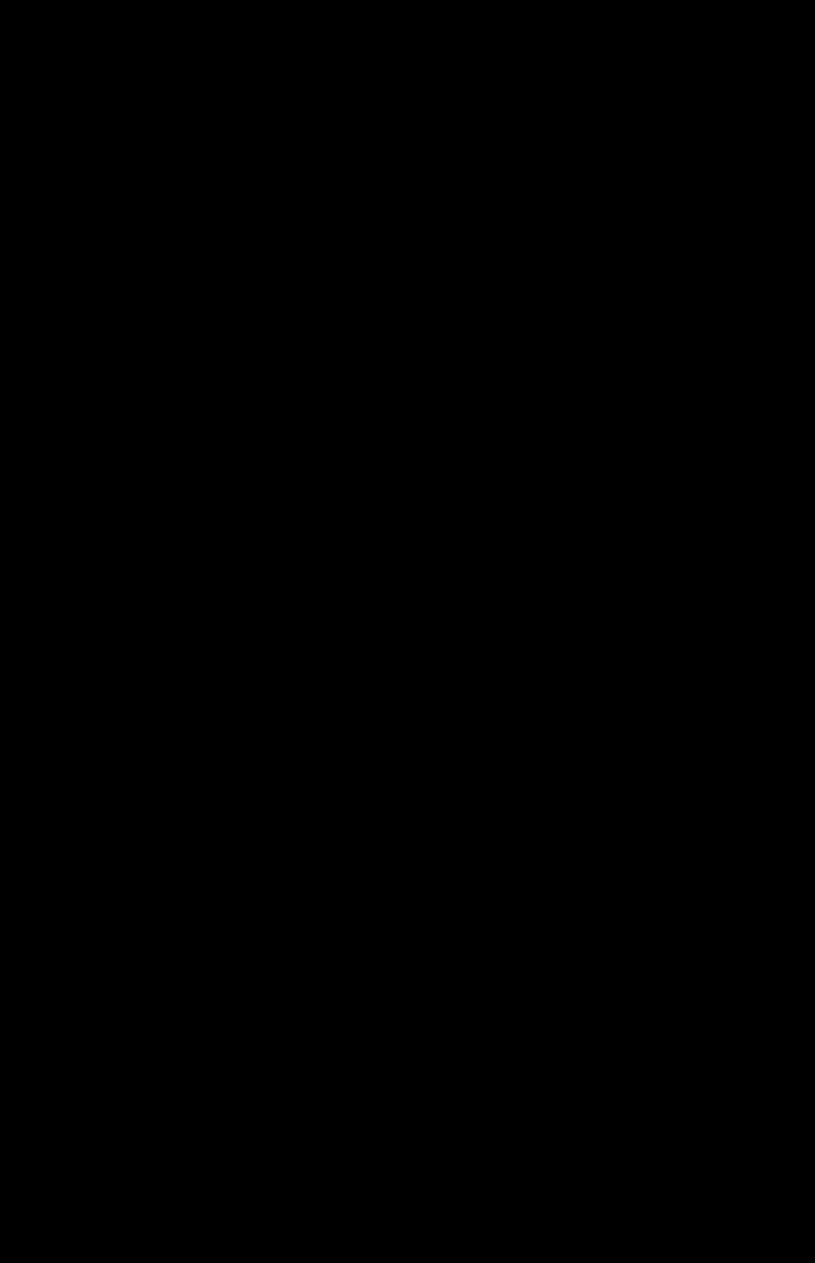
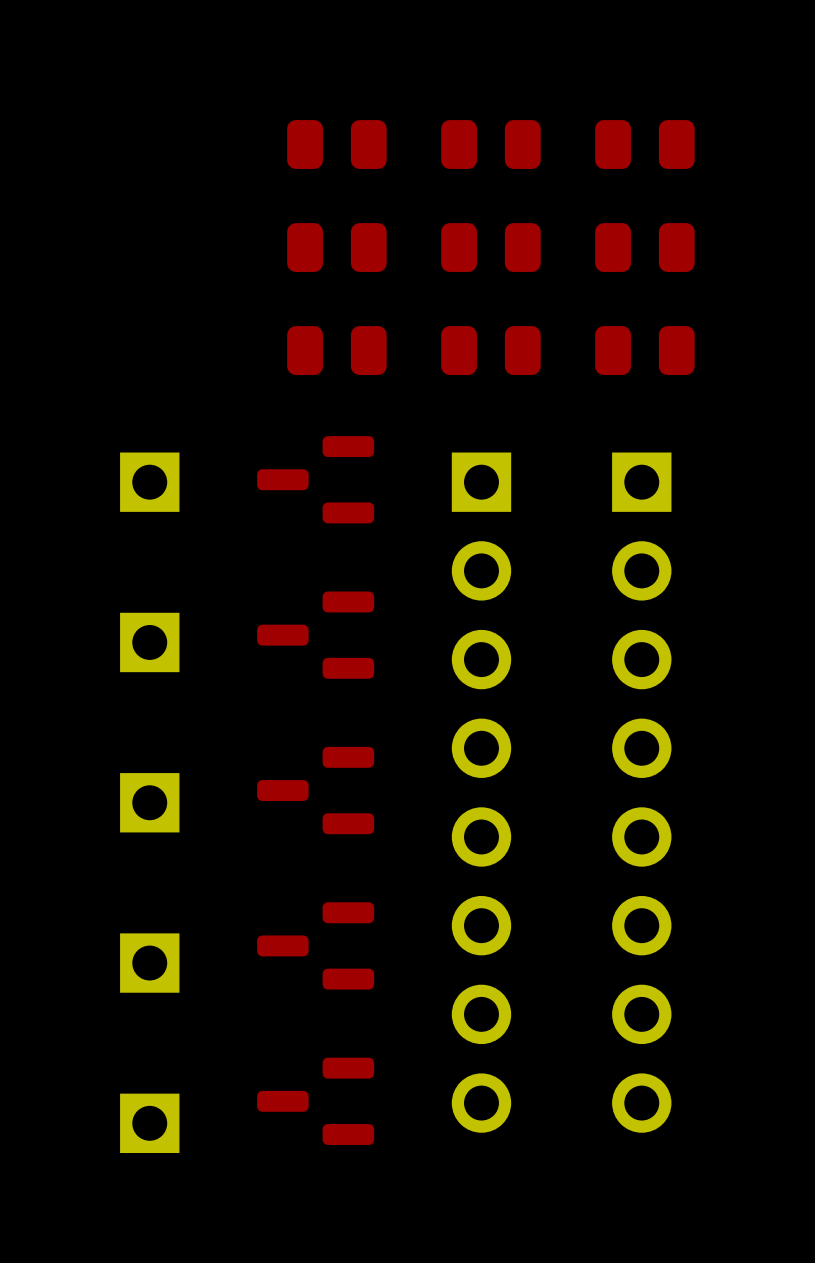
part: none -> (336, 144)
part: none -> (490, 144)
part: none -> (644, 144)
part: none -> (336, 247)
part: none -> (490, 247)
part: none -> (644, 247)
part: none -> (336, 350)
part: none -> (490, 350)
part: none -> (644, 350)
part: none -> (315, 479)
part: none -> (149, 482)
part: none -> (315, 635)
part: none -> (149, 642)
part: none -> (315, 790)
part: none -> (481, 792)
part: none -> (641, 792)
part: none -> (149, 802)
part: none -> (315, 945)
part: none -> (149, 963)
part: none -> (315, 1101)
part: none -> (149, 1123)

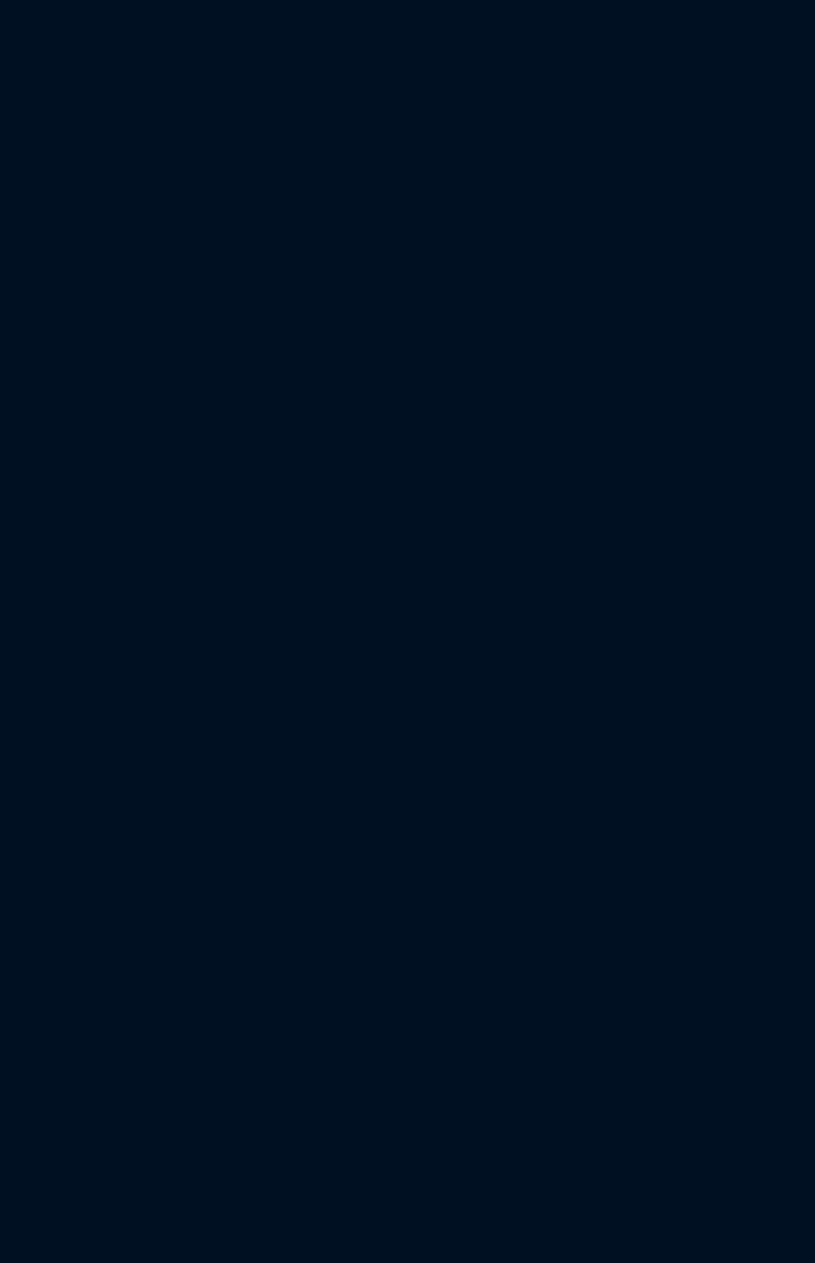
part: (336, 144) -> none
part: (490, 144) -> none
part: (644, 144) -> none
part: (336, 247) -> none
part: (490, 247) -> none
part: (644, 247) -> none
part: (336, 350) -> none
part: (490, 350) -> none
part: (644, 350) -> none
part: (315, 479) -> none
part: (149, 482) -> none
part: (315, 635) -> none
part: (149, 642) -> none
part: (315, 790) -> none
part: (481, 792) -> none
part: (641, 792) -> none
part: (149, 802) -> none
part: (315, 945) -> none
part: (149, 963) -> none
part: (315, 1101) -> none
part: (149, 1123) -> none

